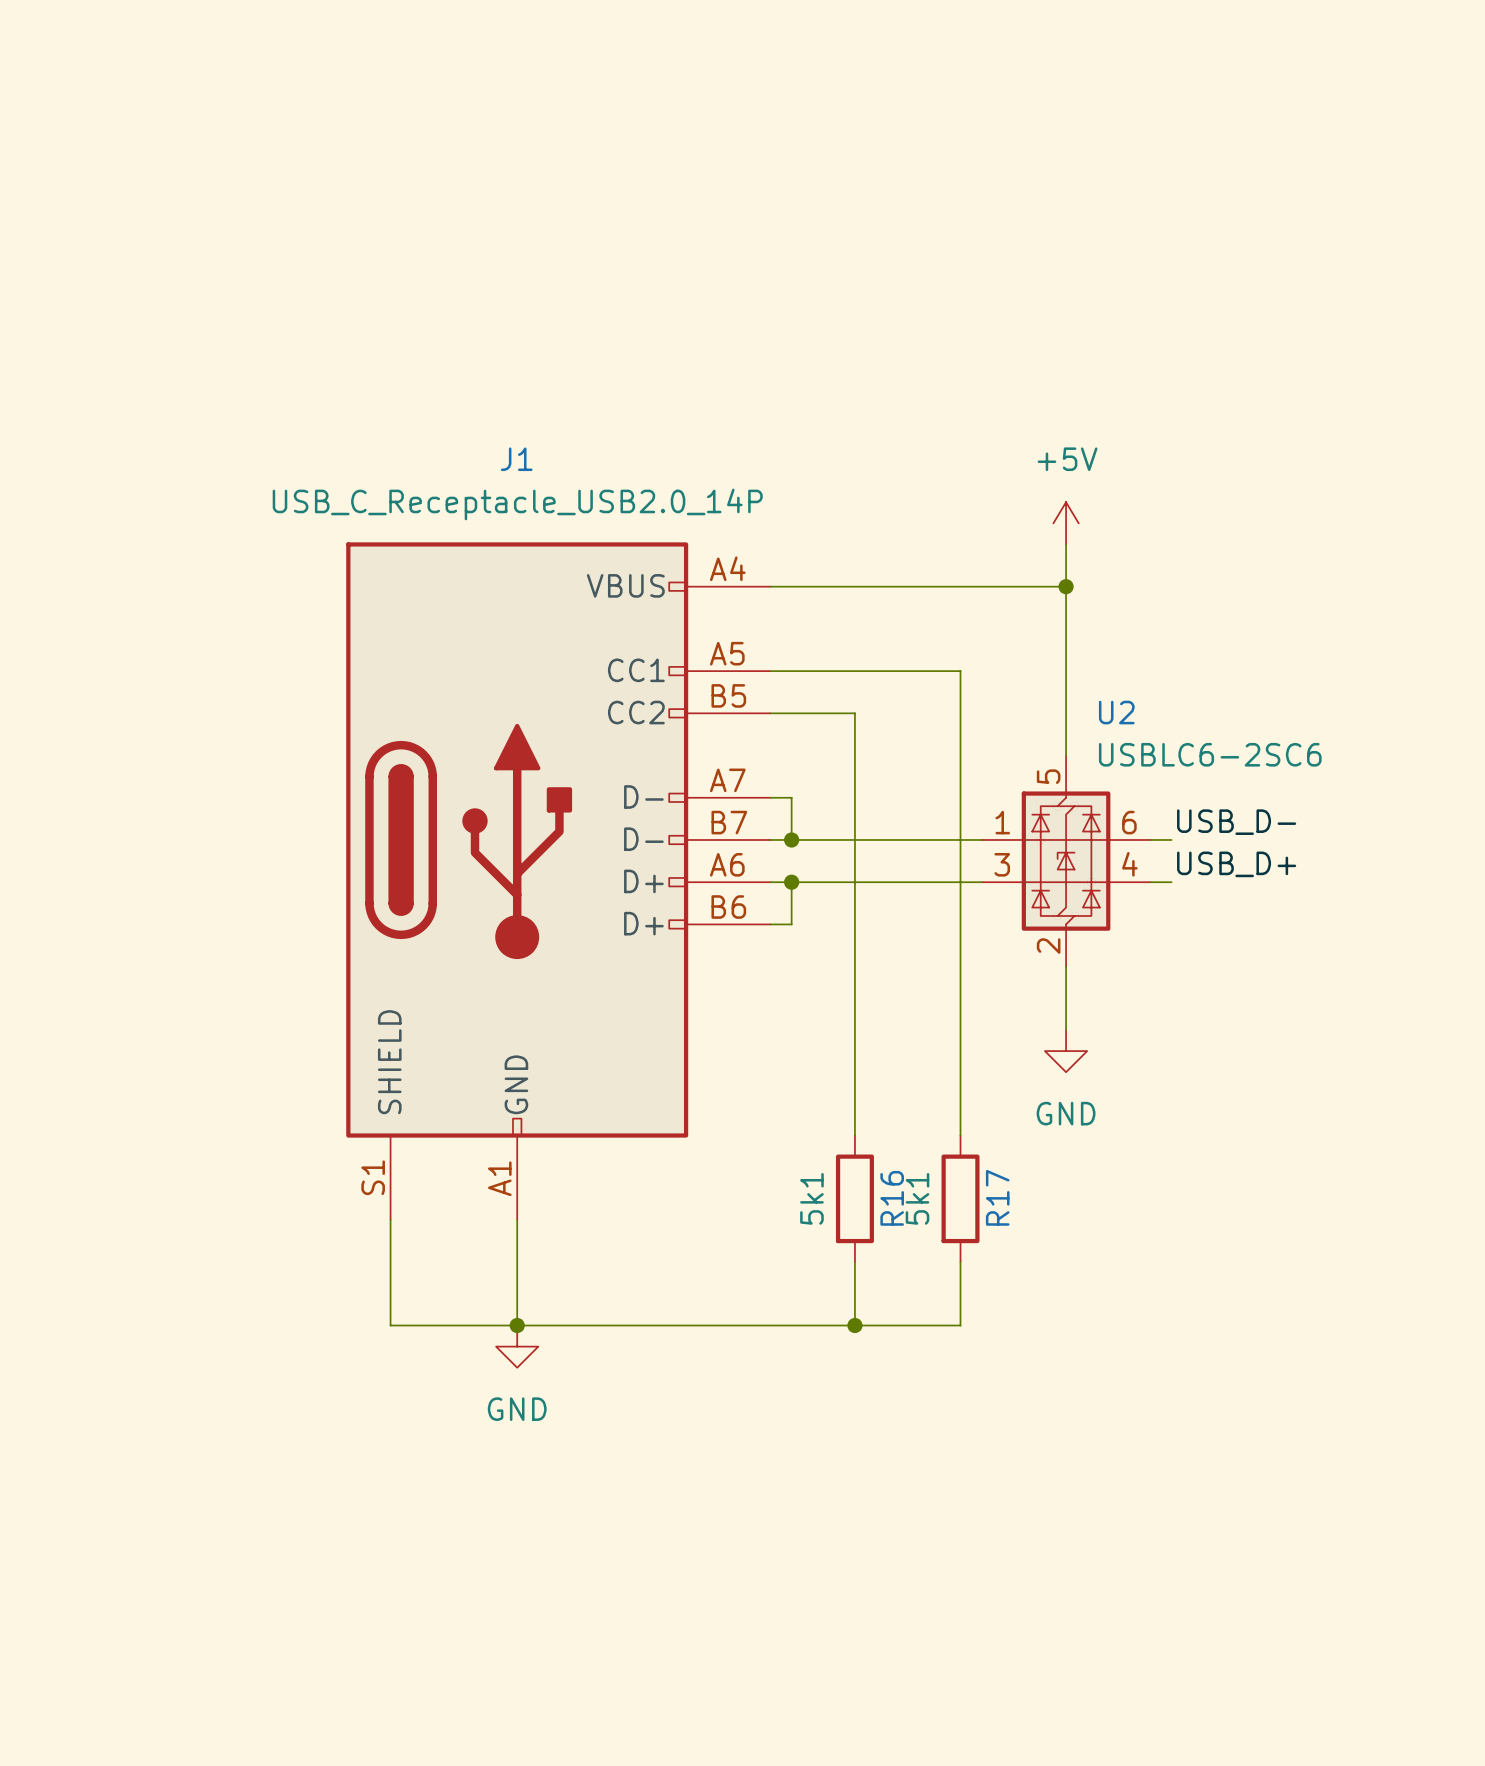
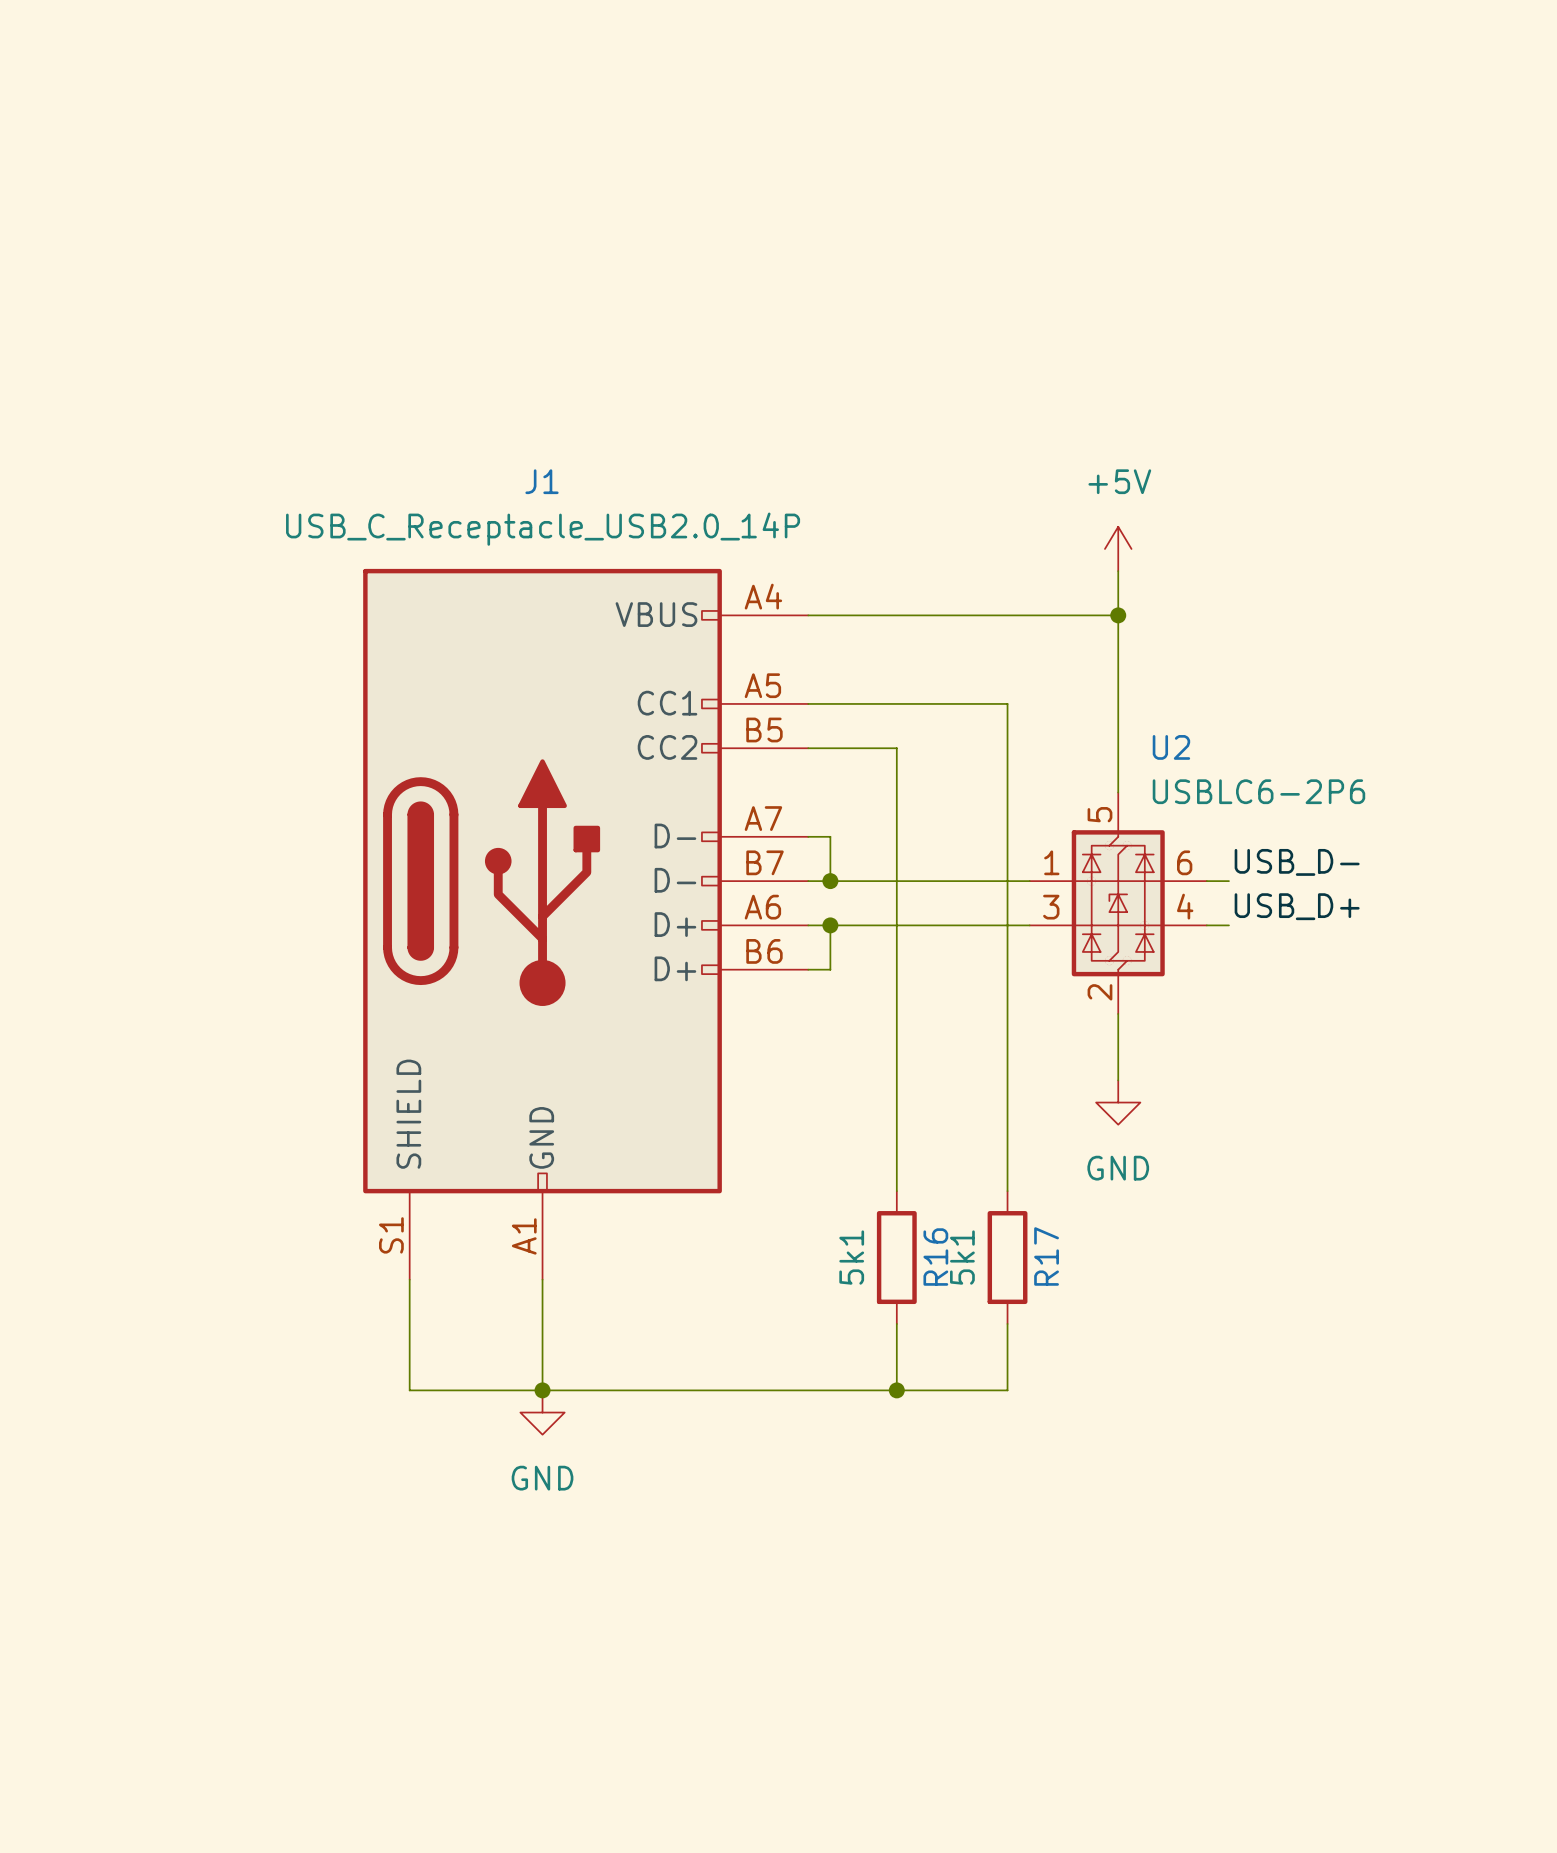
U2 value: USBLC6-2SC6 (1210, 754) -> USBLC6-2P6 (1258, 791)

